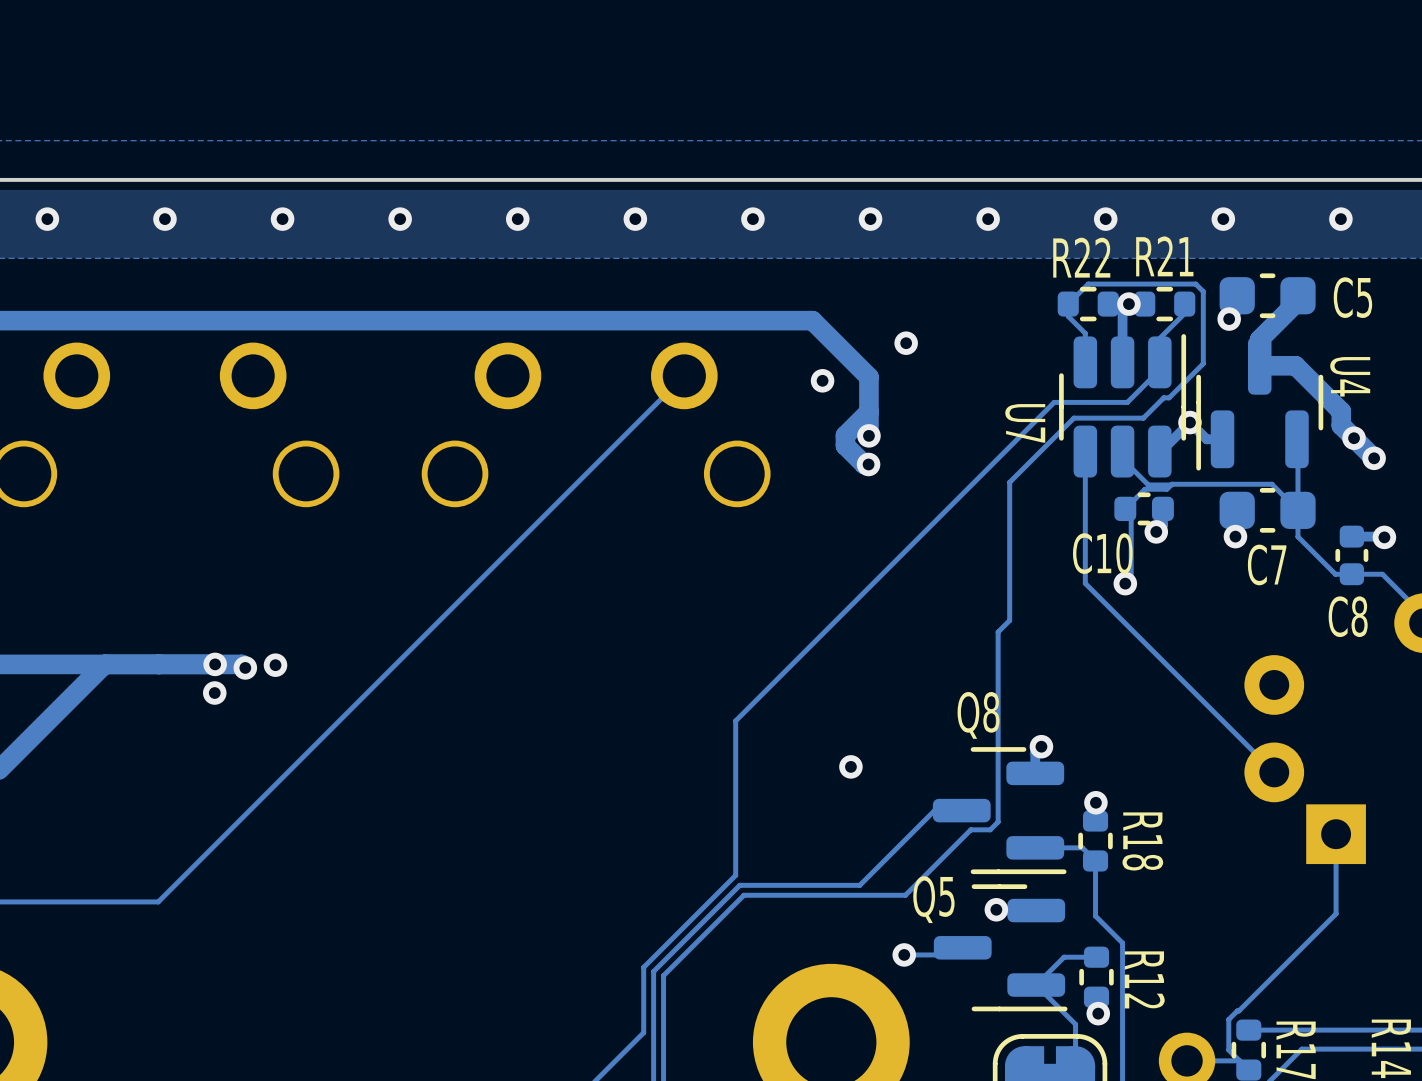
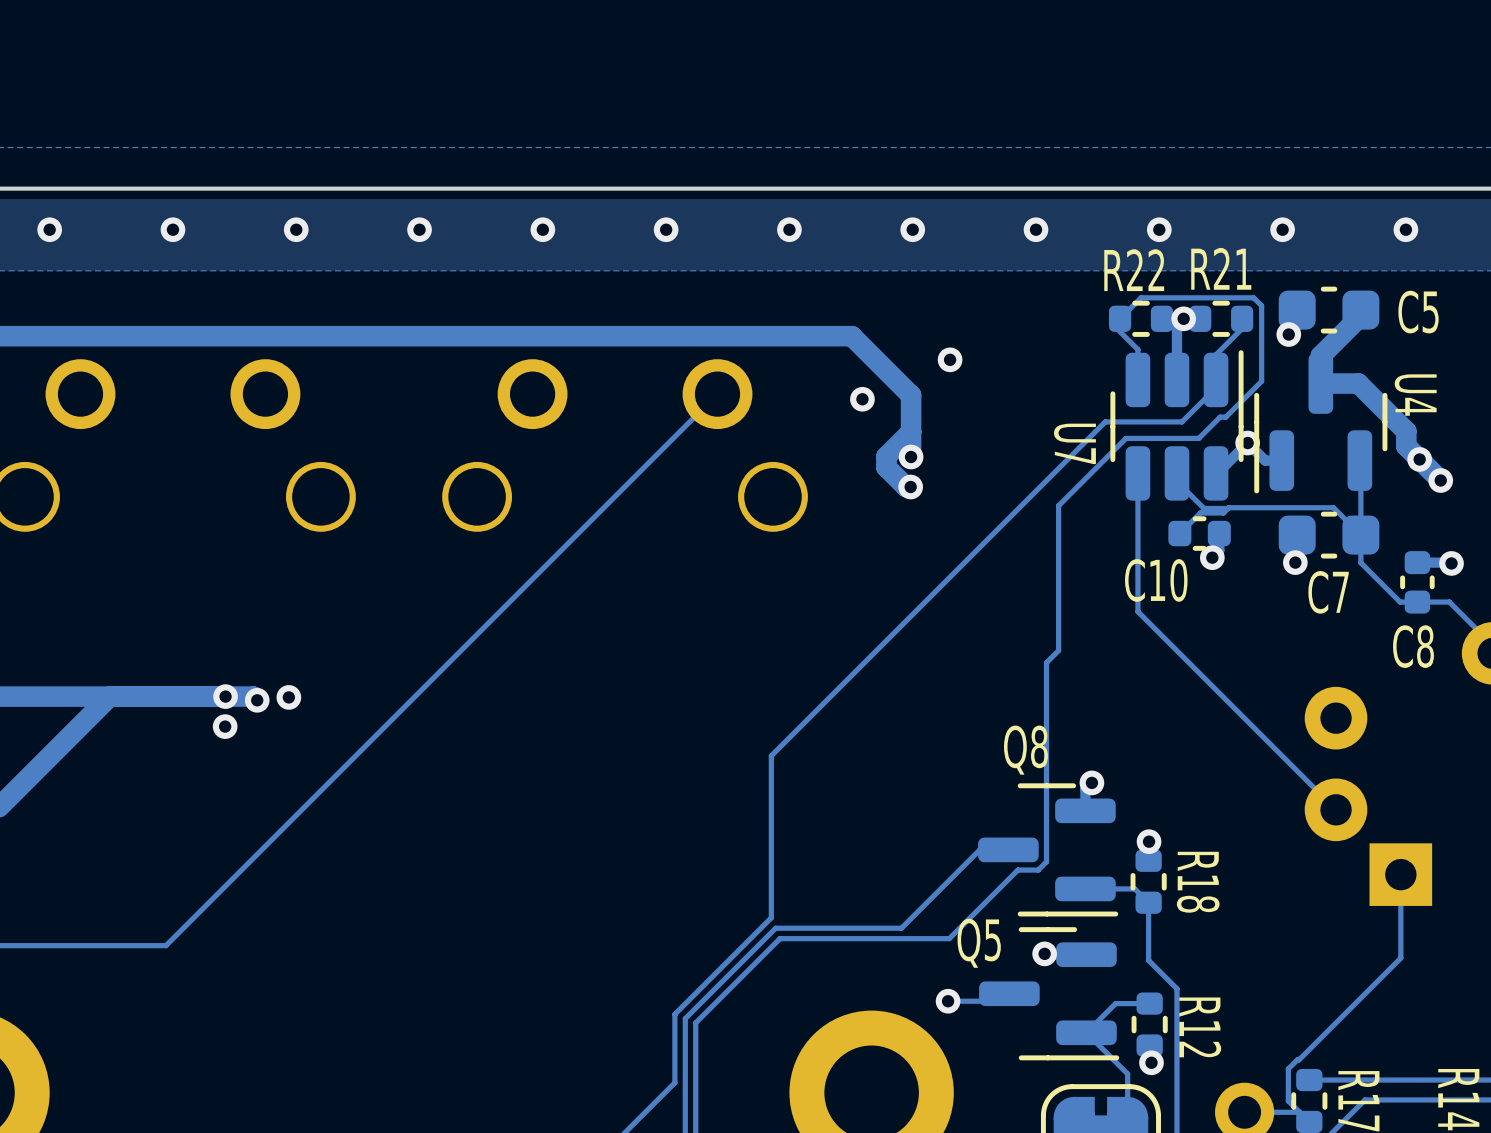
track: (1125, 508) (1131, 514) (1131, 577) (1125, 583) -> none
via: (1125, 583) -> none
via: (850, 766) -> none

